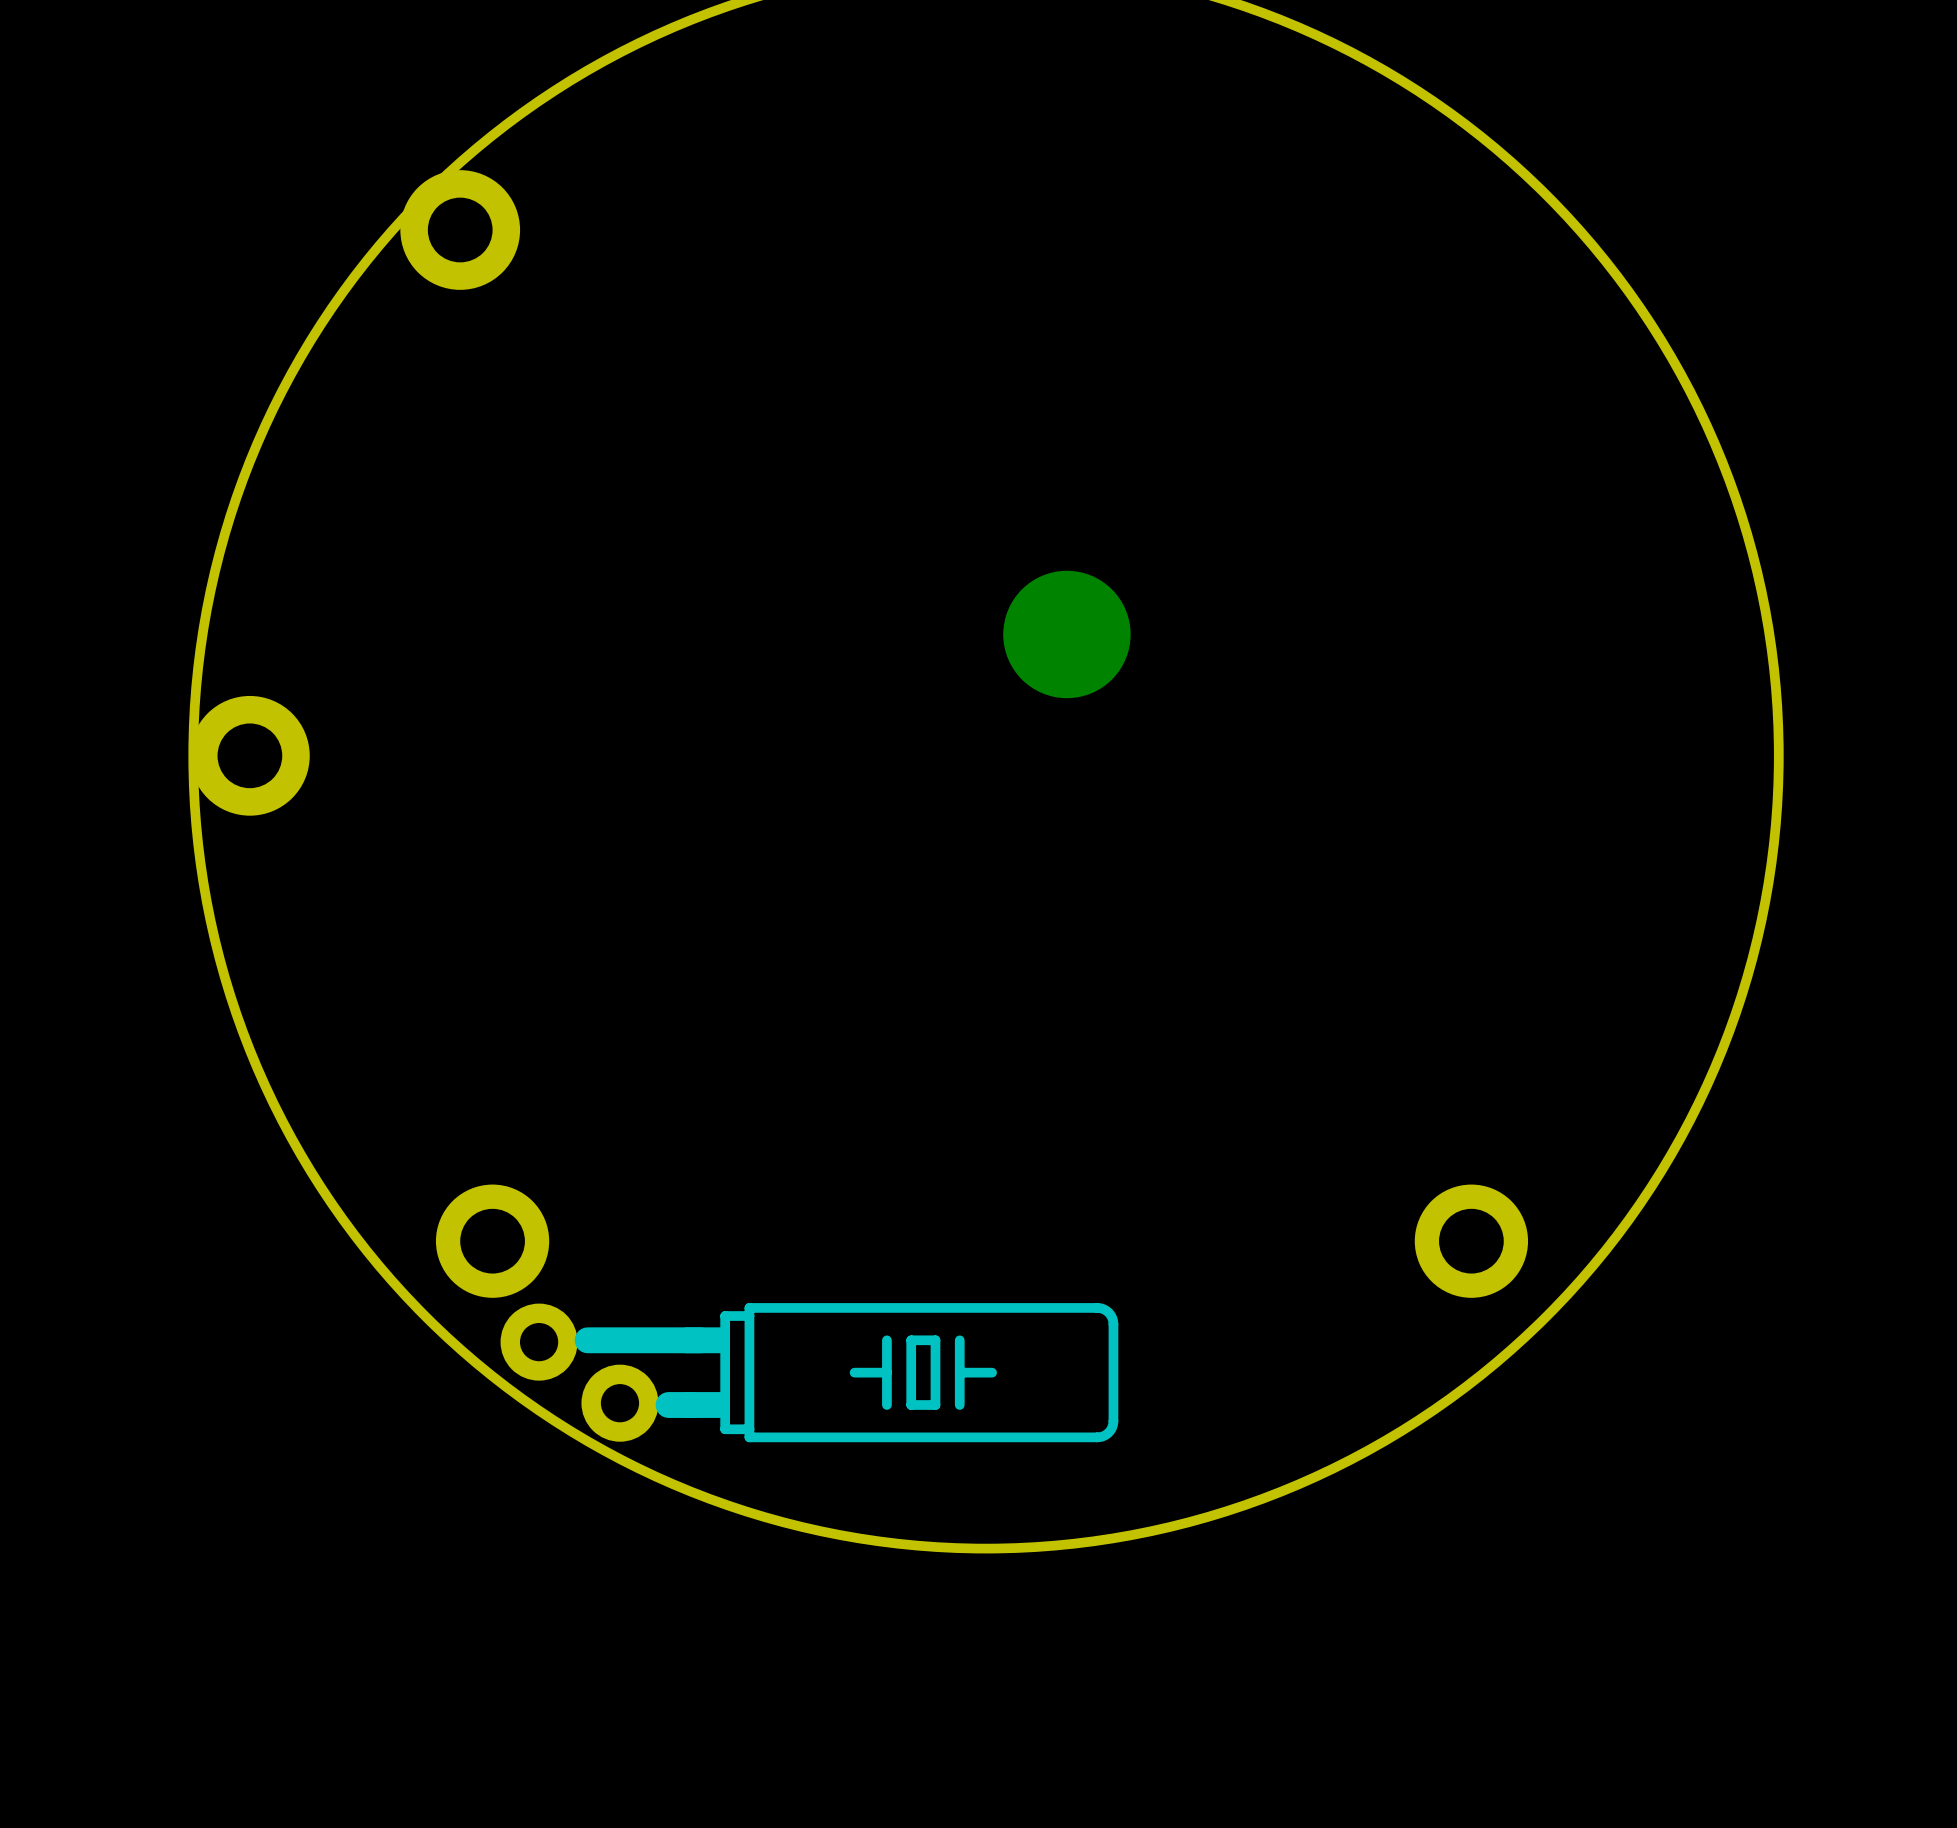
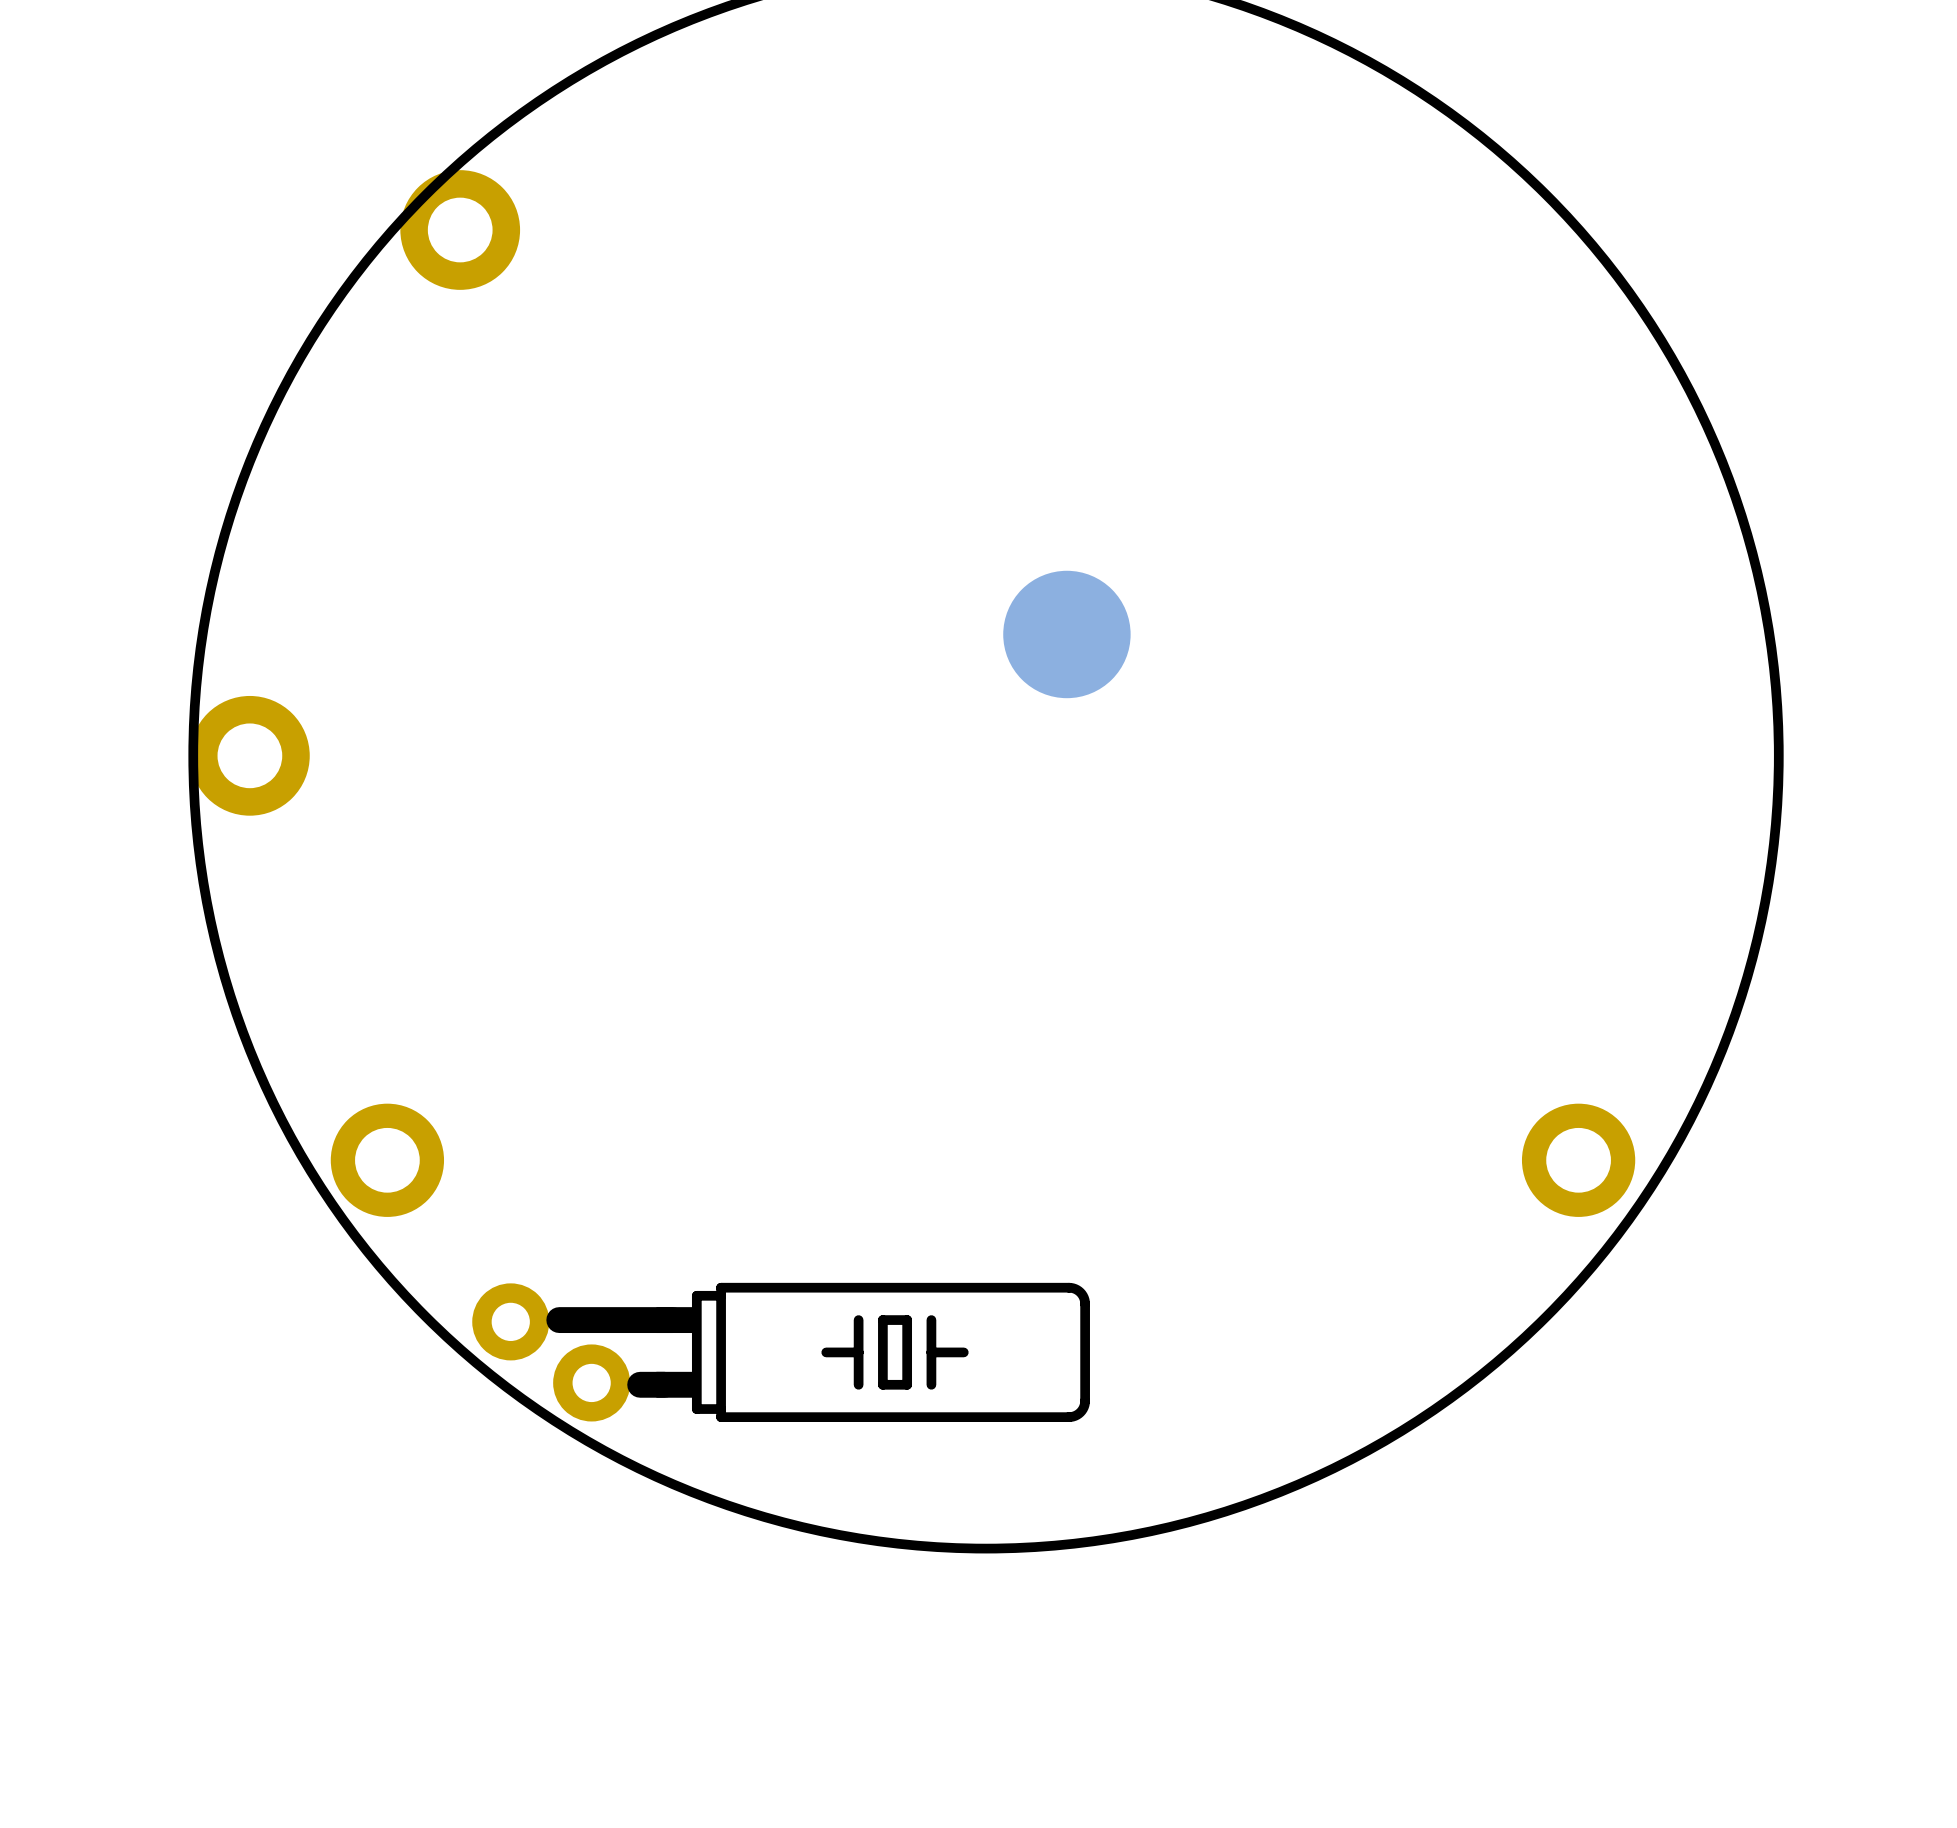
part position: (492, 1241) -> (387, 1160)
part position: (1471, 1241) -> (1578, 1160)
part position: (809, 1372) -> (781, 1352)

